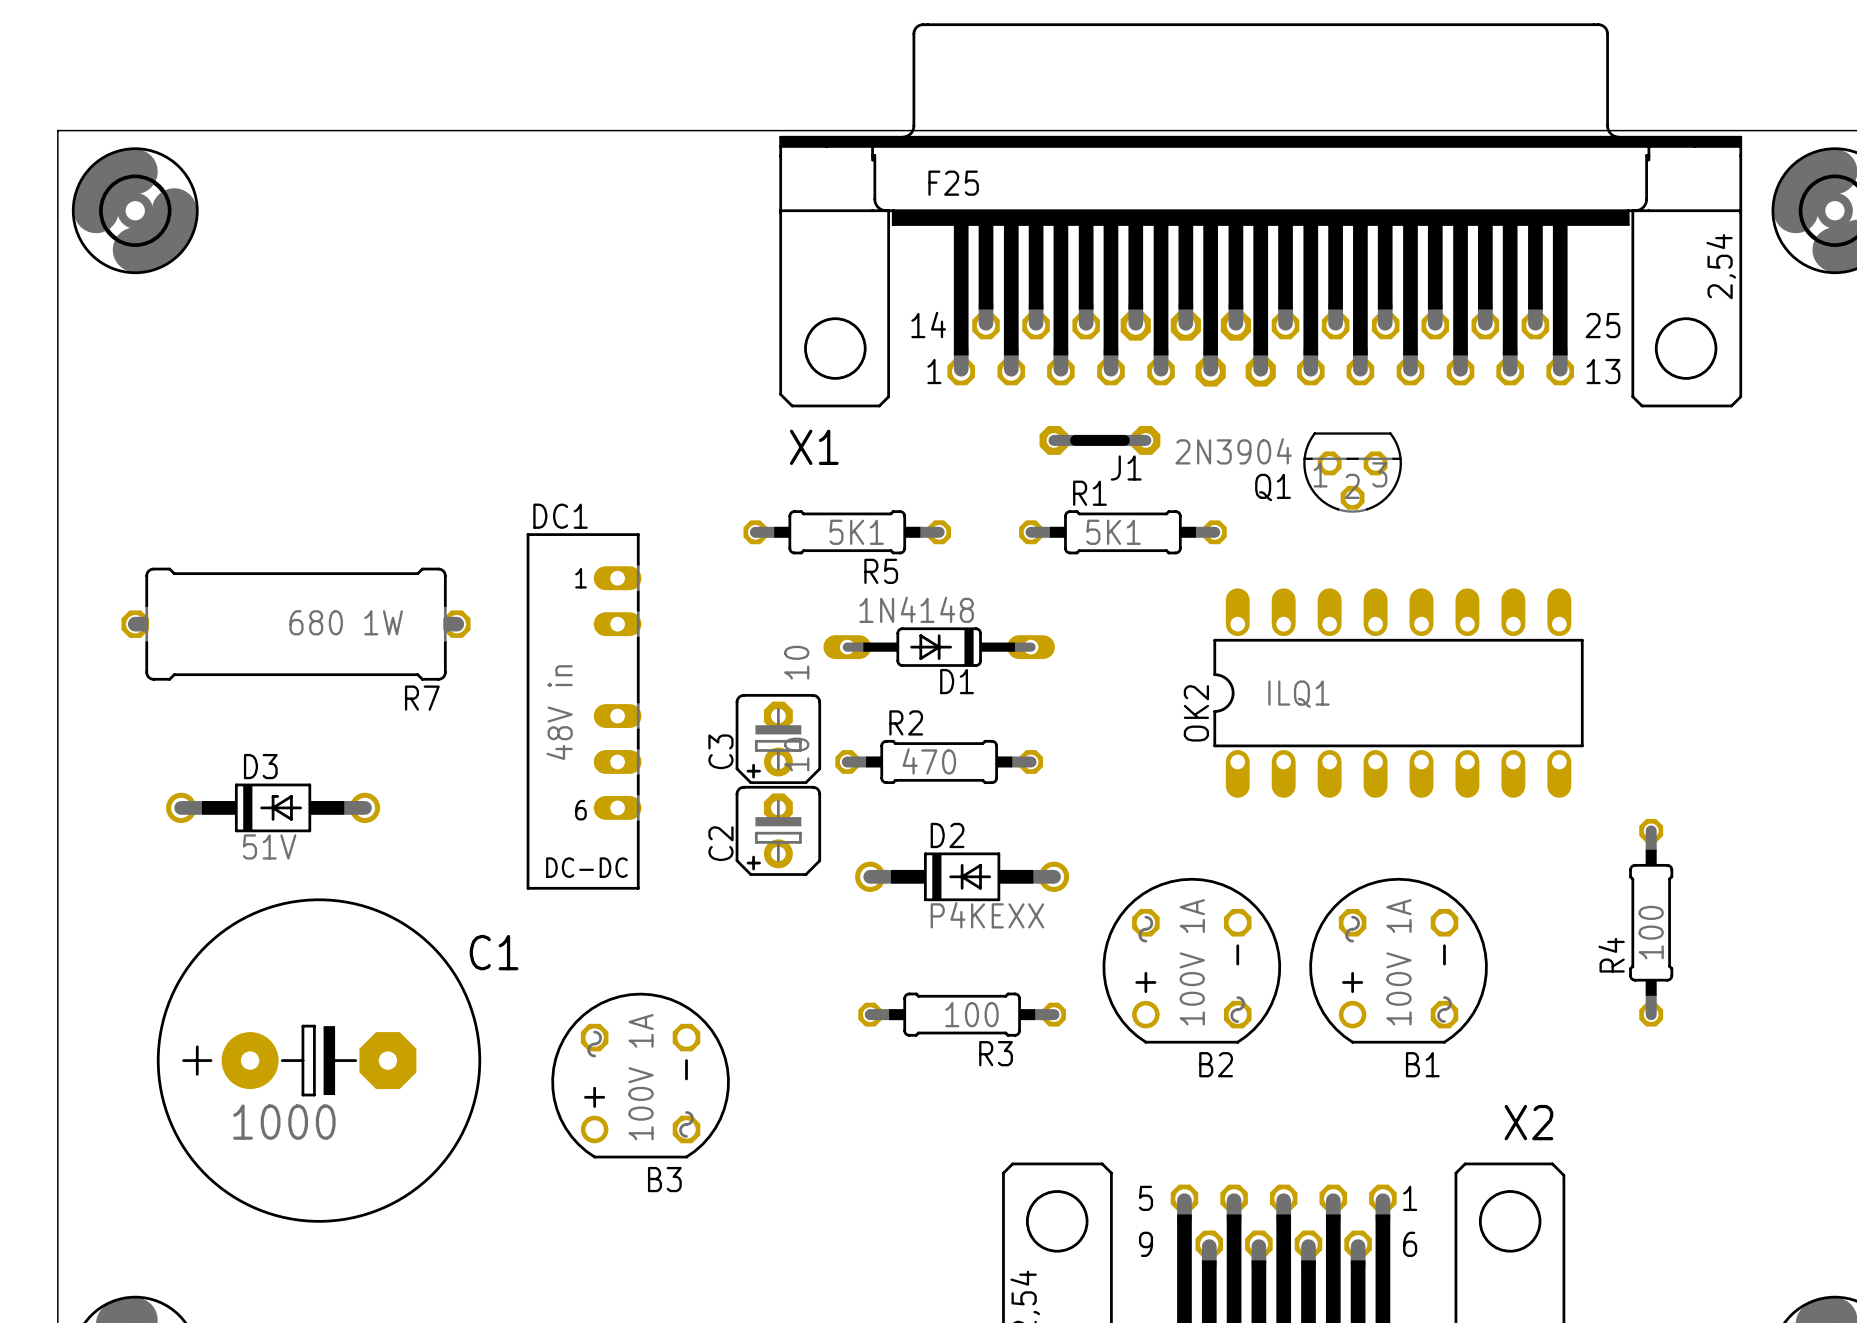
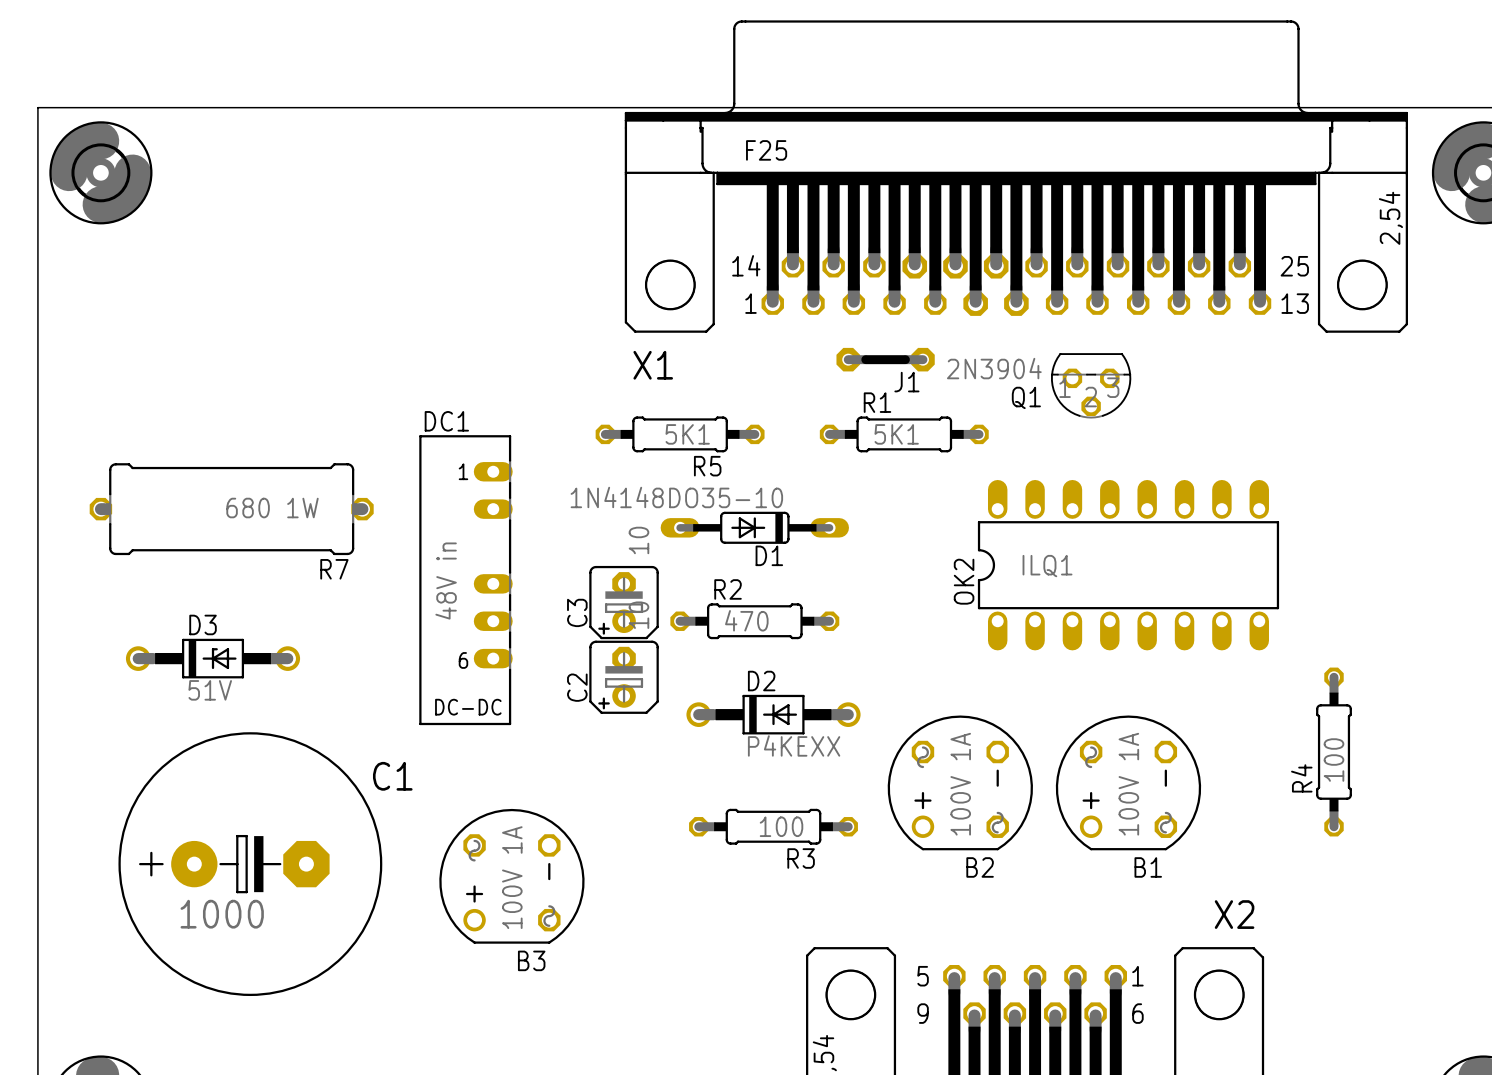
D1 value: 1N4148 (916, 609) -> 1N4148DO35-10 (676, 497)

